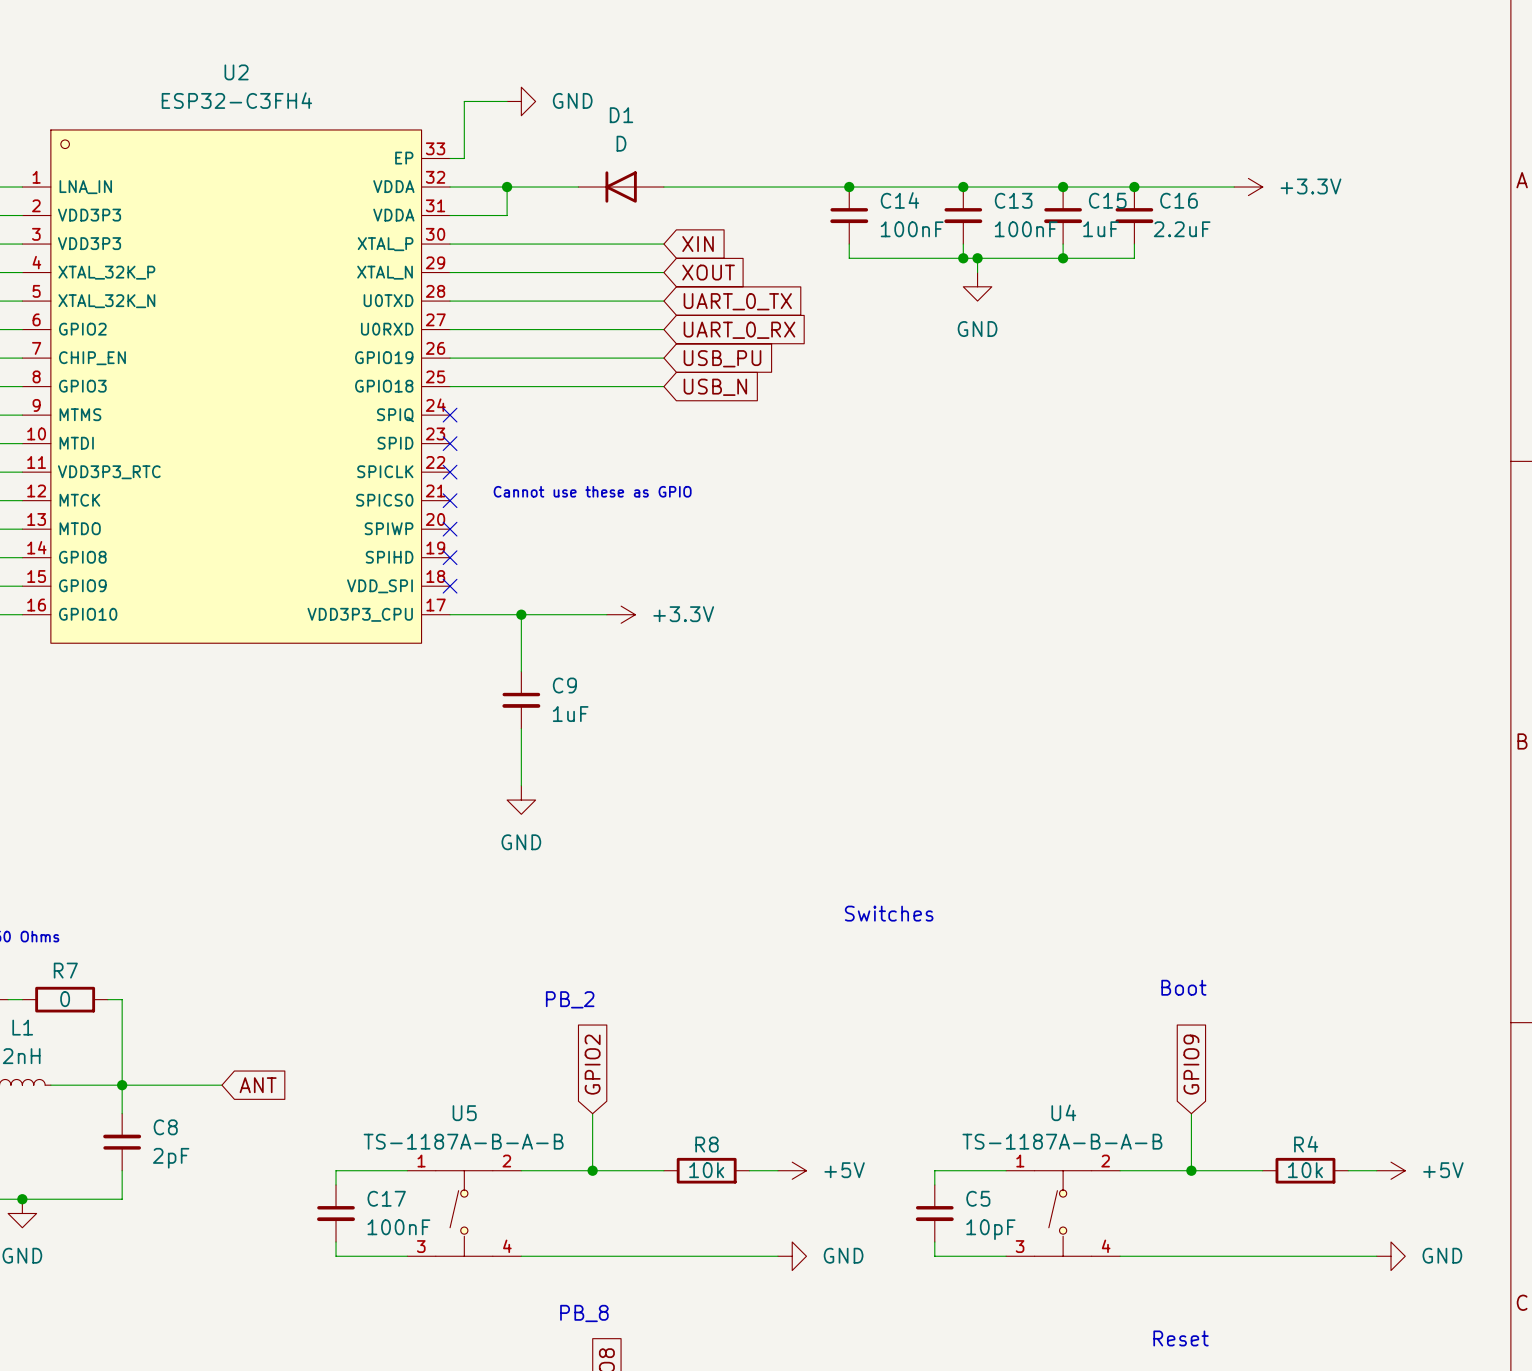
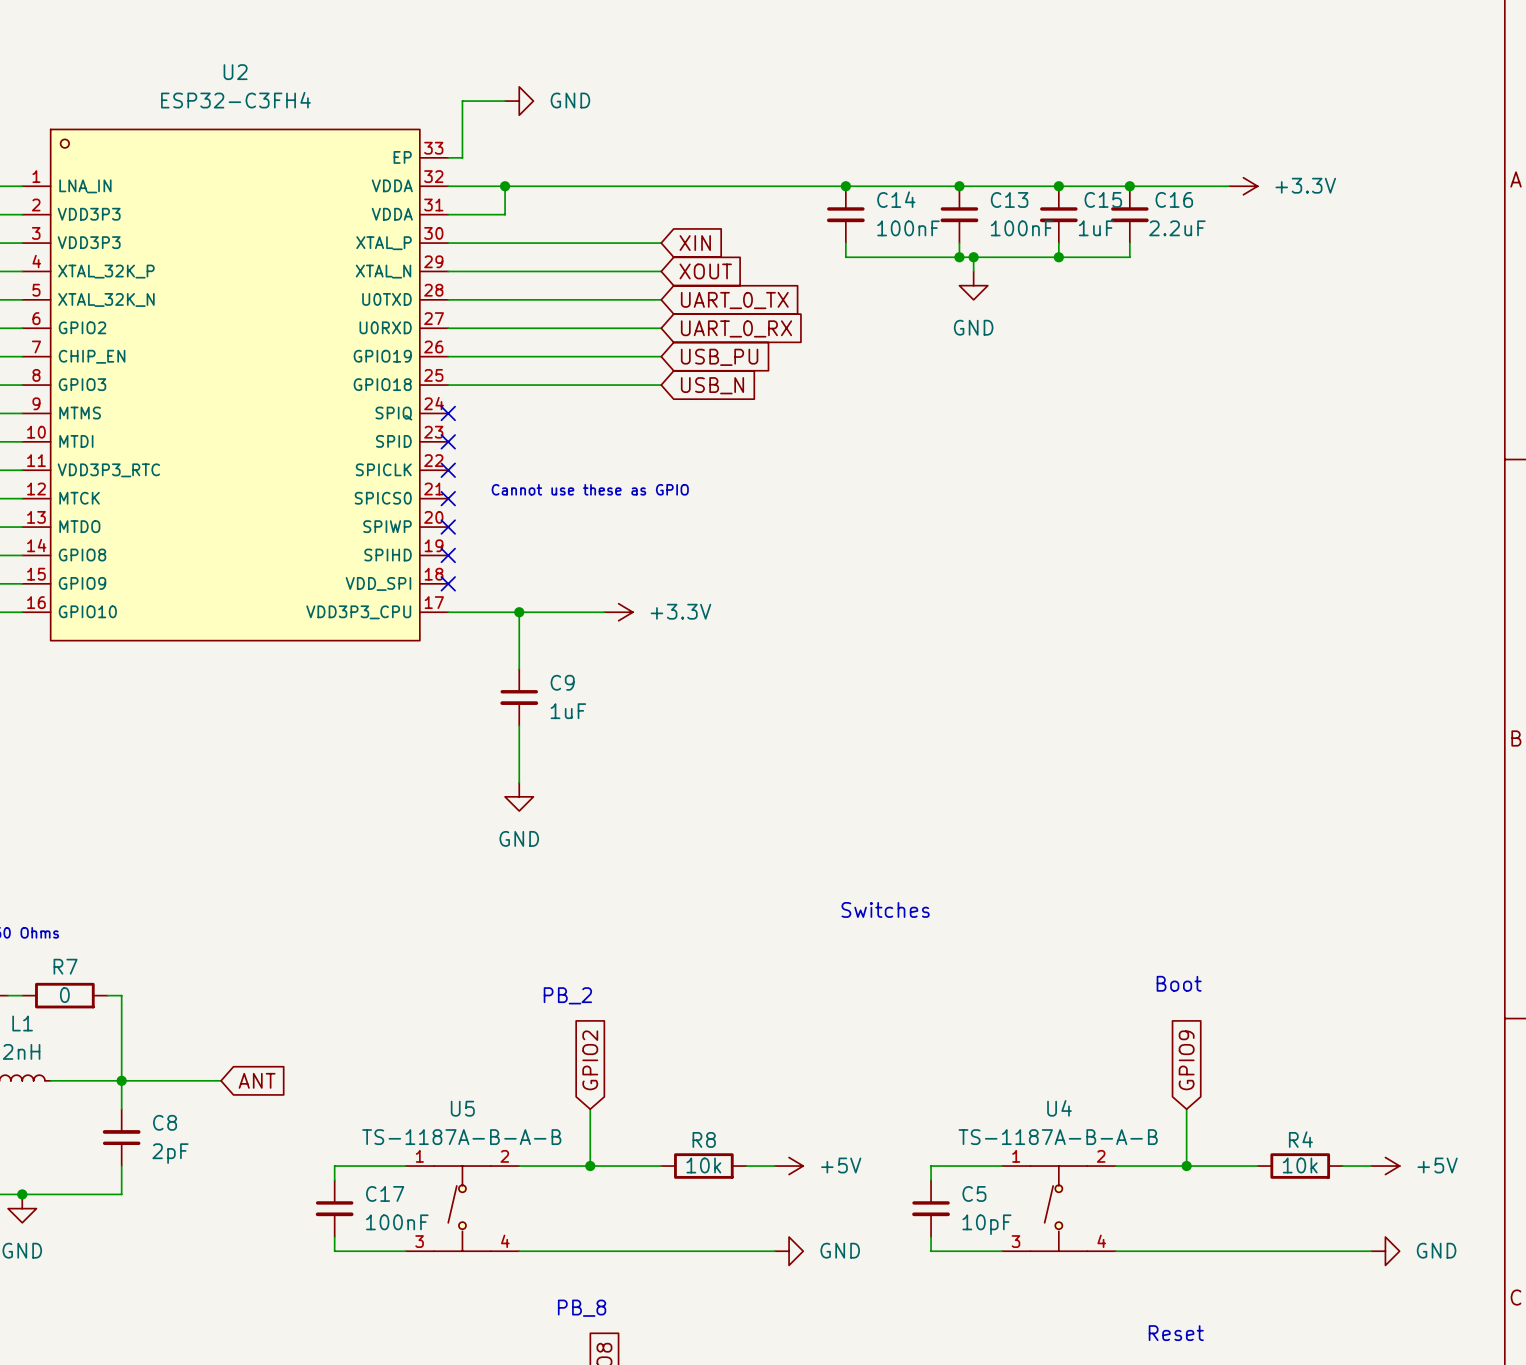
D1: D (621, 187) -> none

